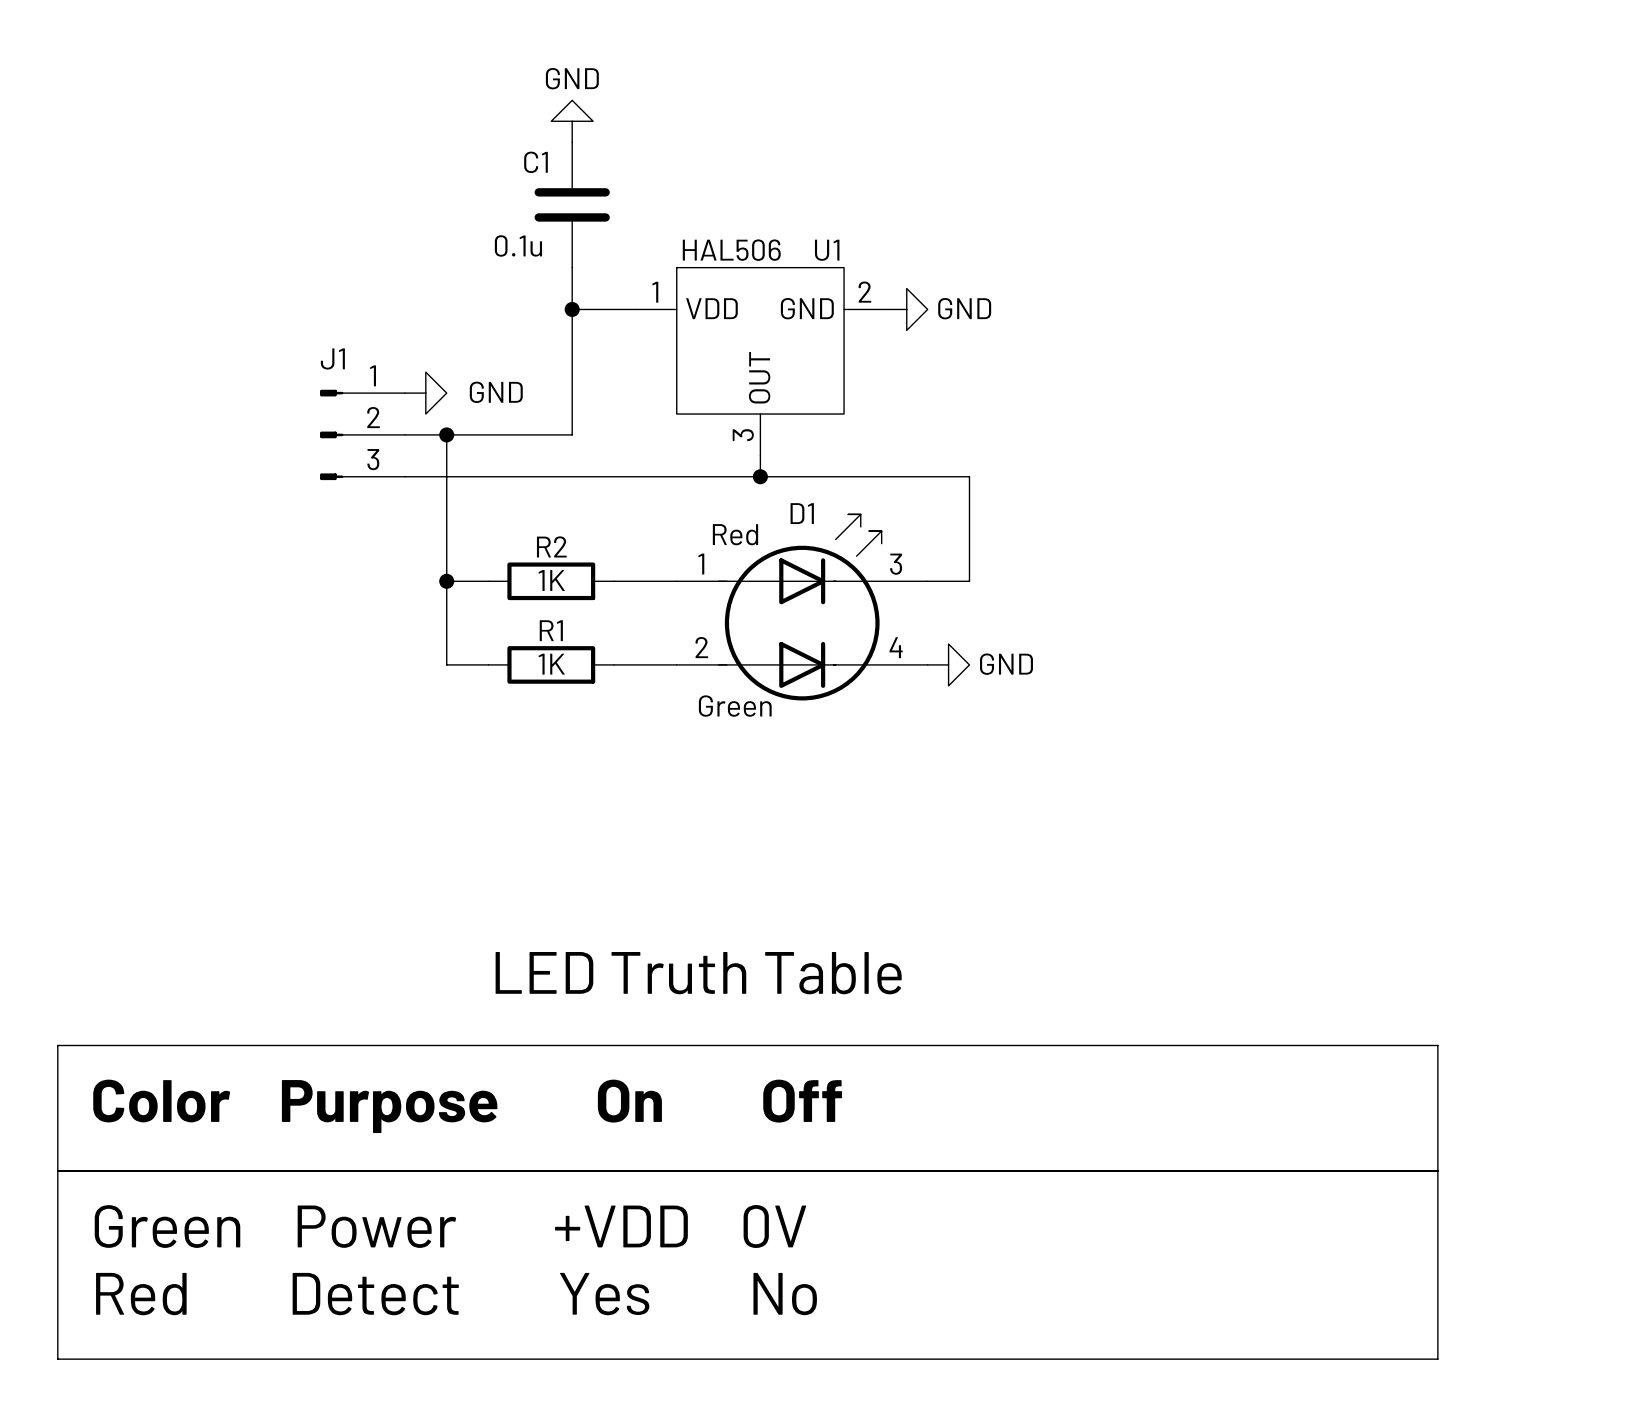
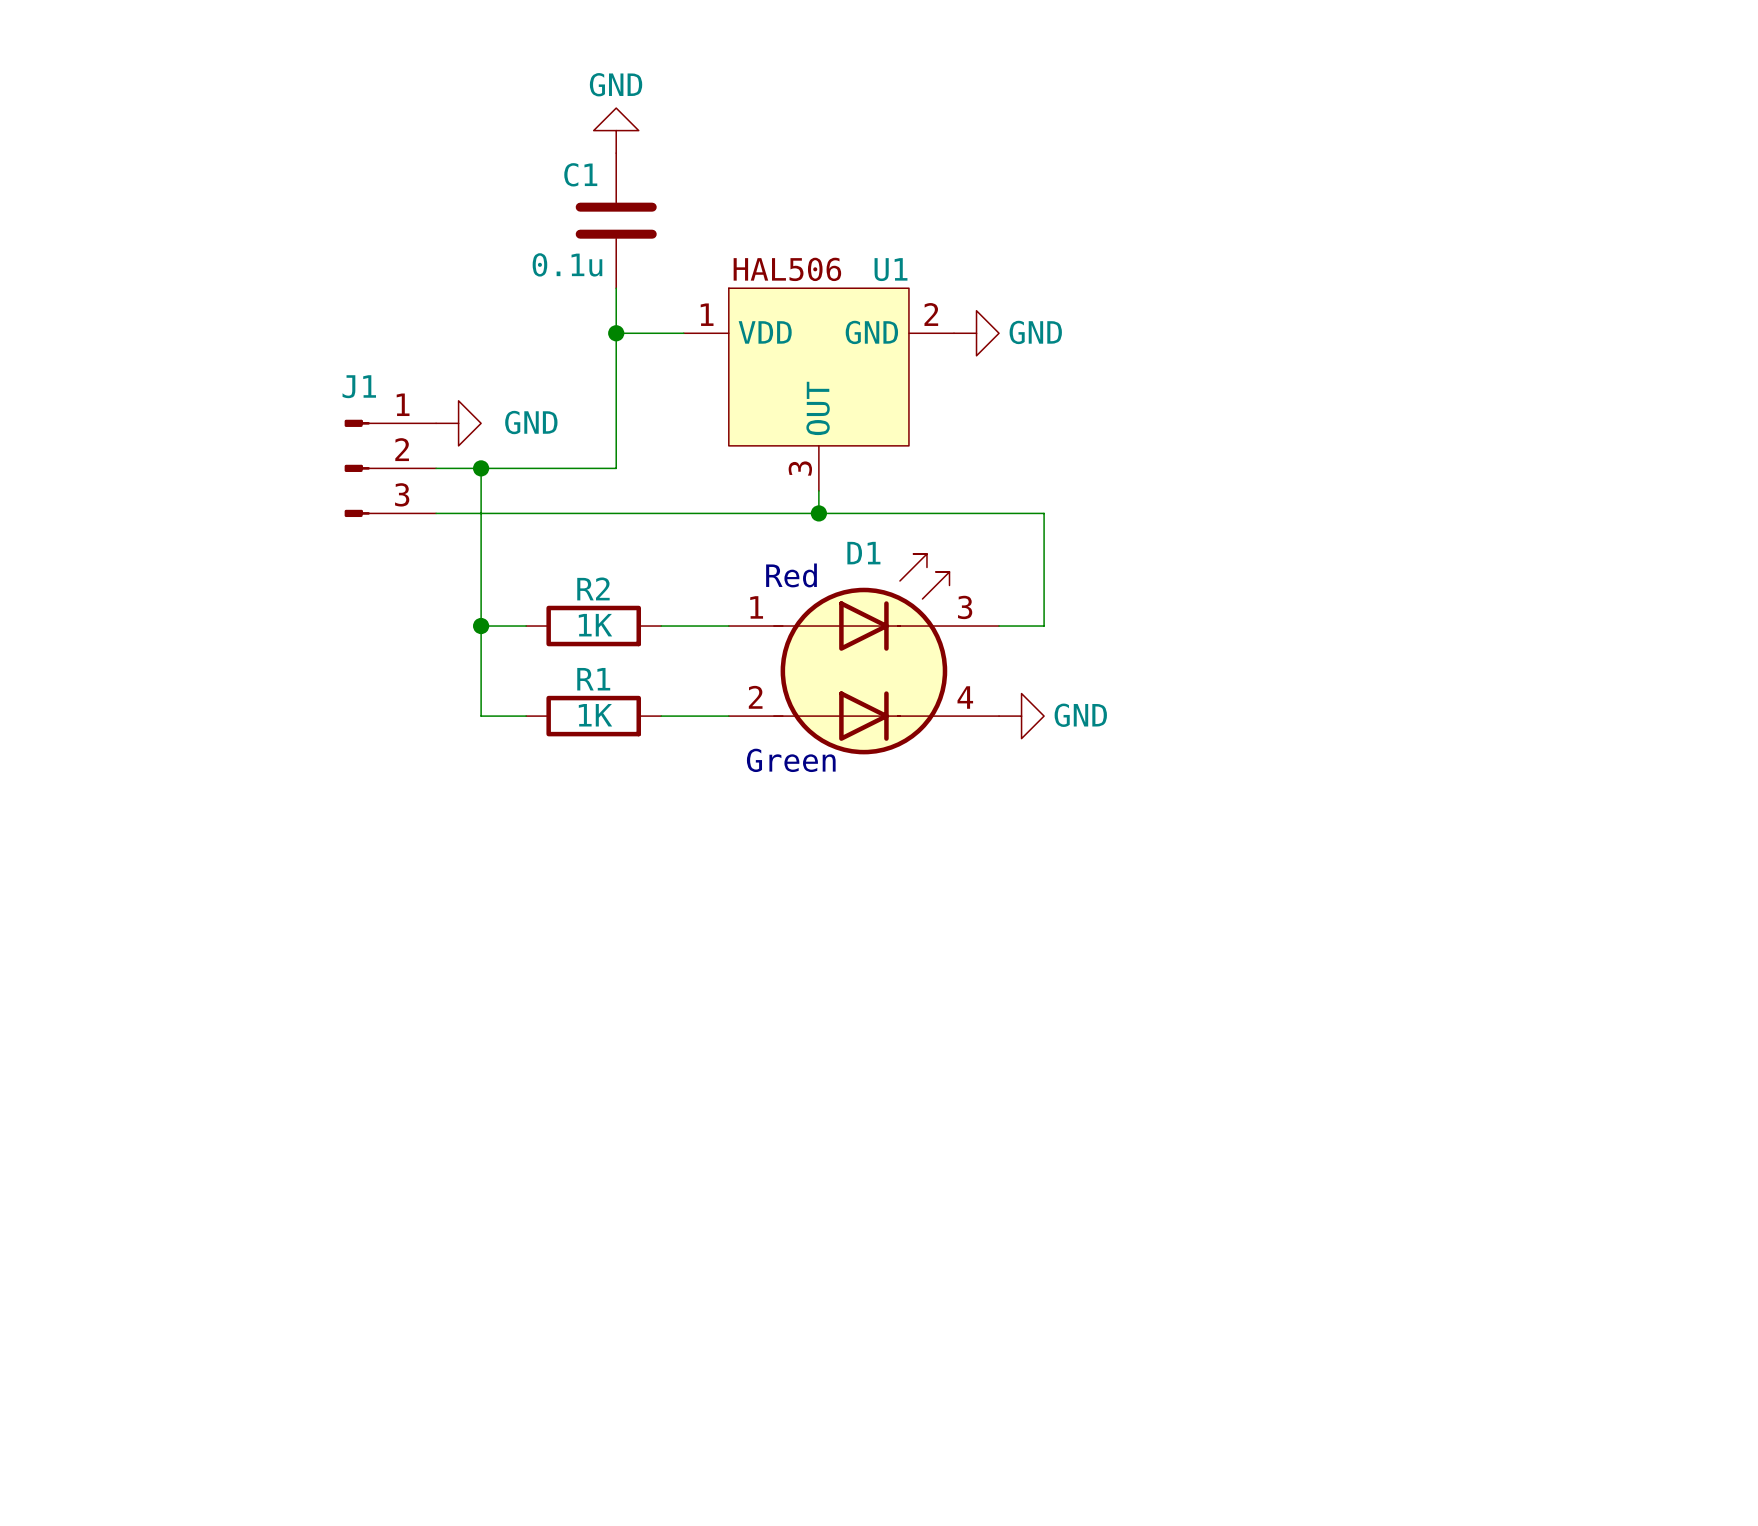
text: LED Truth Table (698, 973) -> none
line: (57, 1045) (1437, 1045) (1437, 1359) (57, 1359) (57, 1045) -> none
text: Color Purpose On Off (467, 1106) -> none
line: (57, 1170) (1437, 1170) -> none
text: Green Power +VDD 0V (450, 1226) -> none
text: Red Detect Yes No (456, 1294) -> none

